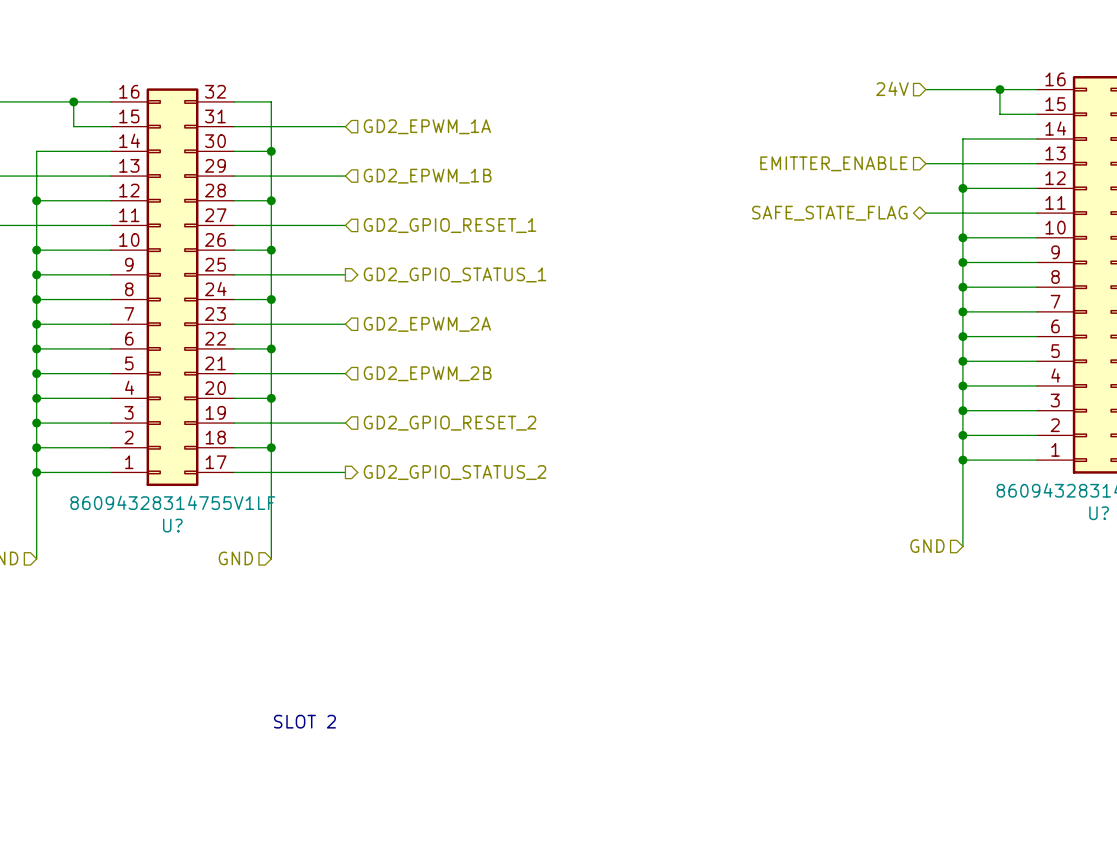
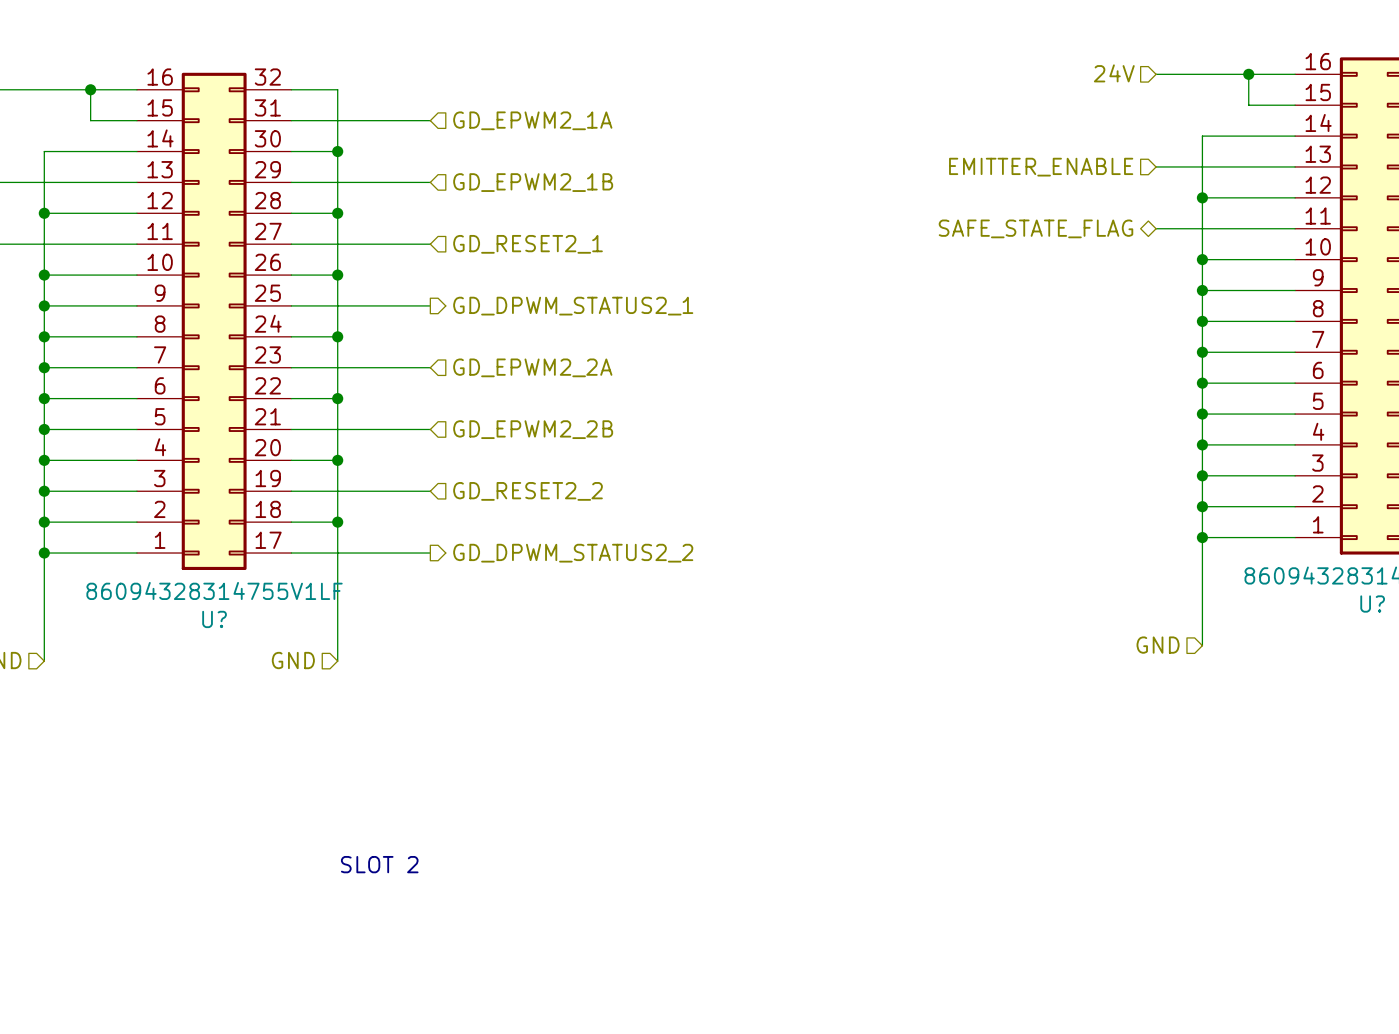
hierarchical label: GD2_EPWM_1A (427, 126) -> GD_EPWM2_1A (532, 120)
hierarchical label: GD2_EPWM_1B (427, 176) -> GD_EPWM2_1B (533, 182)
hierarchical label: GD2_GPIO_RESET_1 (450, 225) -> GD_RESET2_1 (528, 244)
hierarchical label: GD2_GPIO_STATUS_1 (455, 274) -> GD_DPWM_STATUS2_1 (573, 306)
hierarchical label: GD2_EPWM_2A (427, 324) -> GD_EPWM2_2A (532, 367)
hierarchical label: GD2_EPWM_2B (427, 373) -> GD_EPWM2_2B (533, 429)
hierarchical label: GD2_GPIO_RESET_2 (450, 423) -> GD_RESET2_2 (528, 491)
hierarchical label: GD2_GPIO_STATUS_2 (455, 472) -> GD_DPWM_STATUS2_2 (573, 553)

